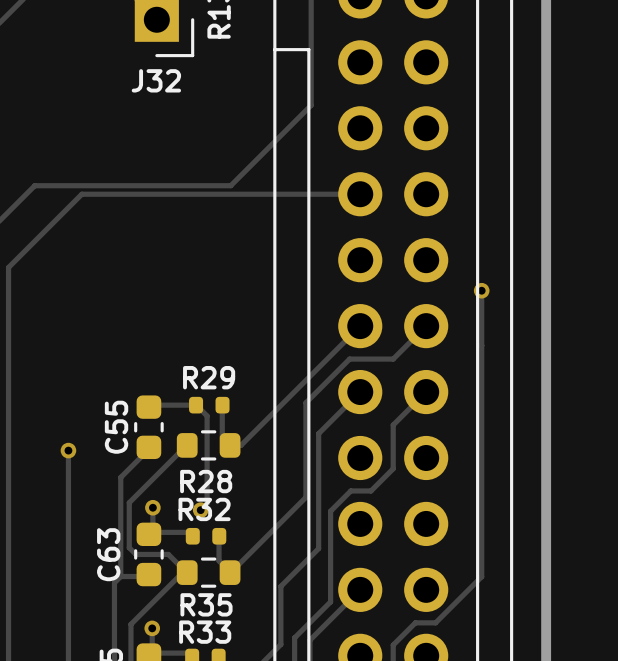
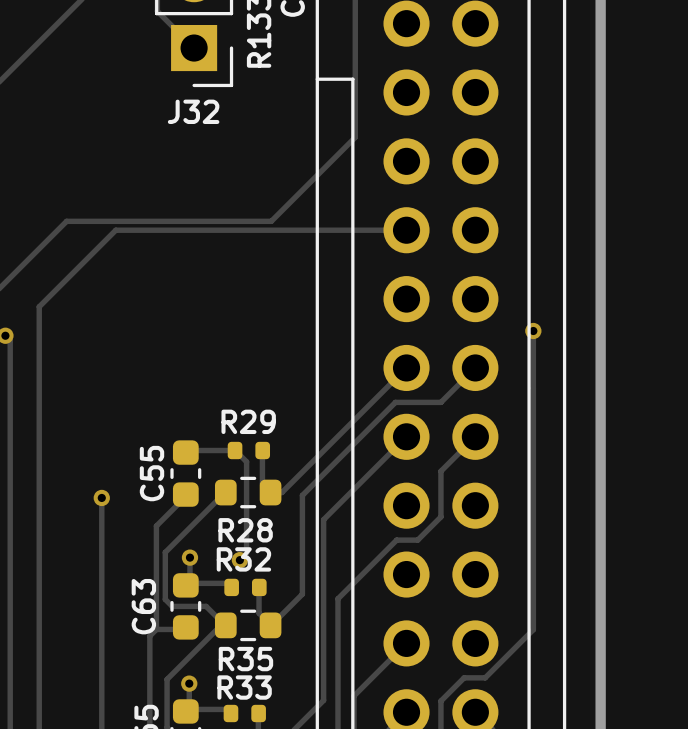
track: (349, 359) (305, 402) (305, 497) (260, 542) -> (395, 402) (302, 495) (302, 594)
track: (318, 433) (318, 548) (280, 586) -> (363, 480) (323, 519) (323, 639)
track: (330, 511) (330, 601) (294, 637) -> (375, 561) (337, 598) (337, 693)

